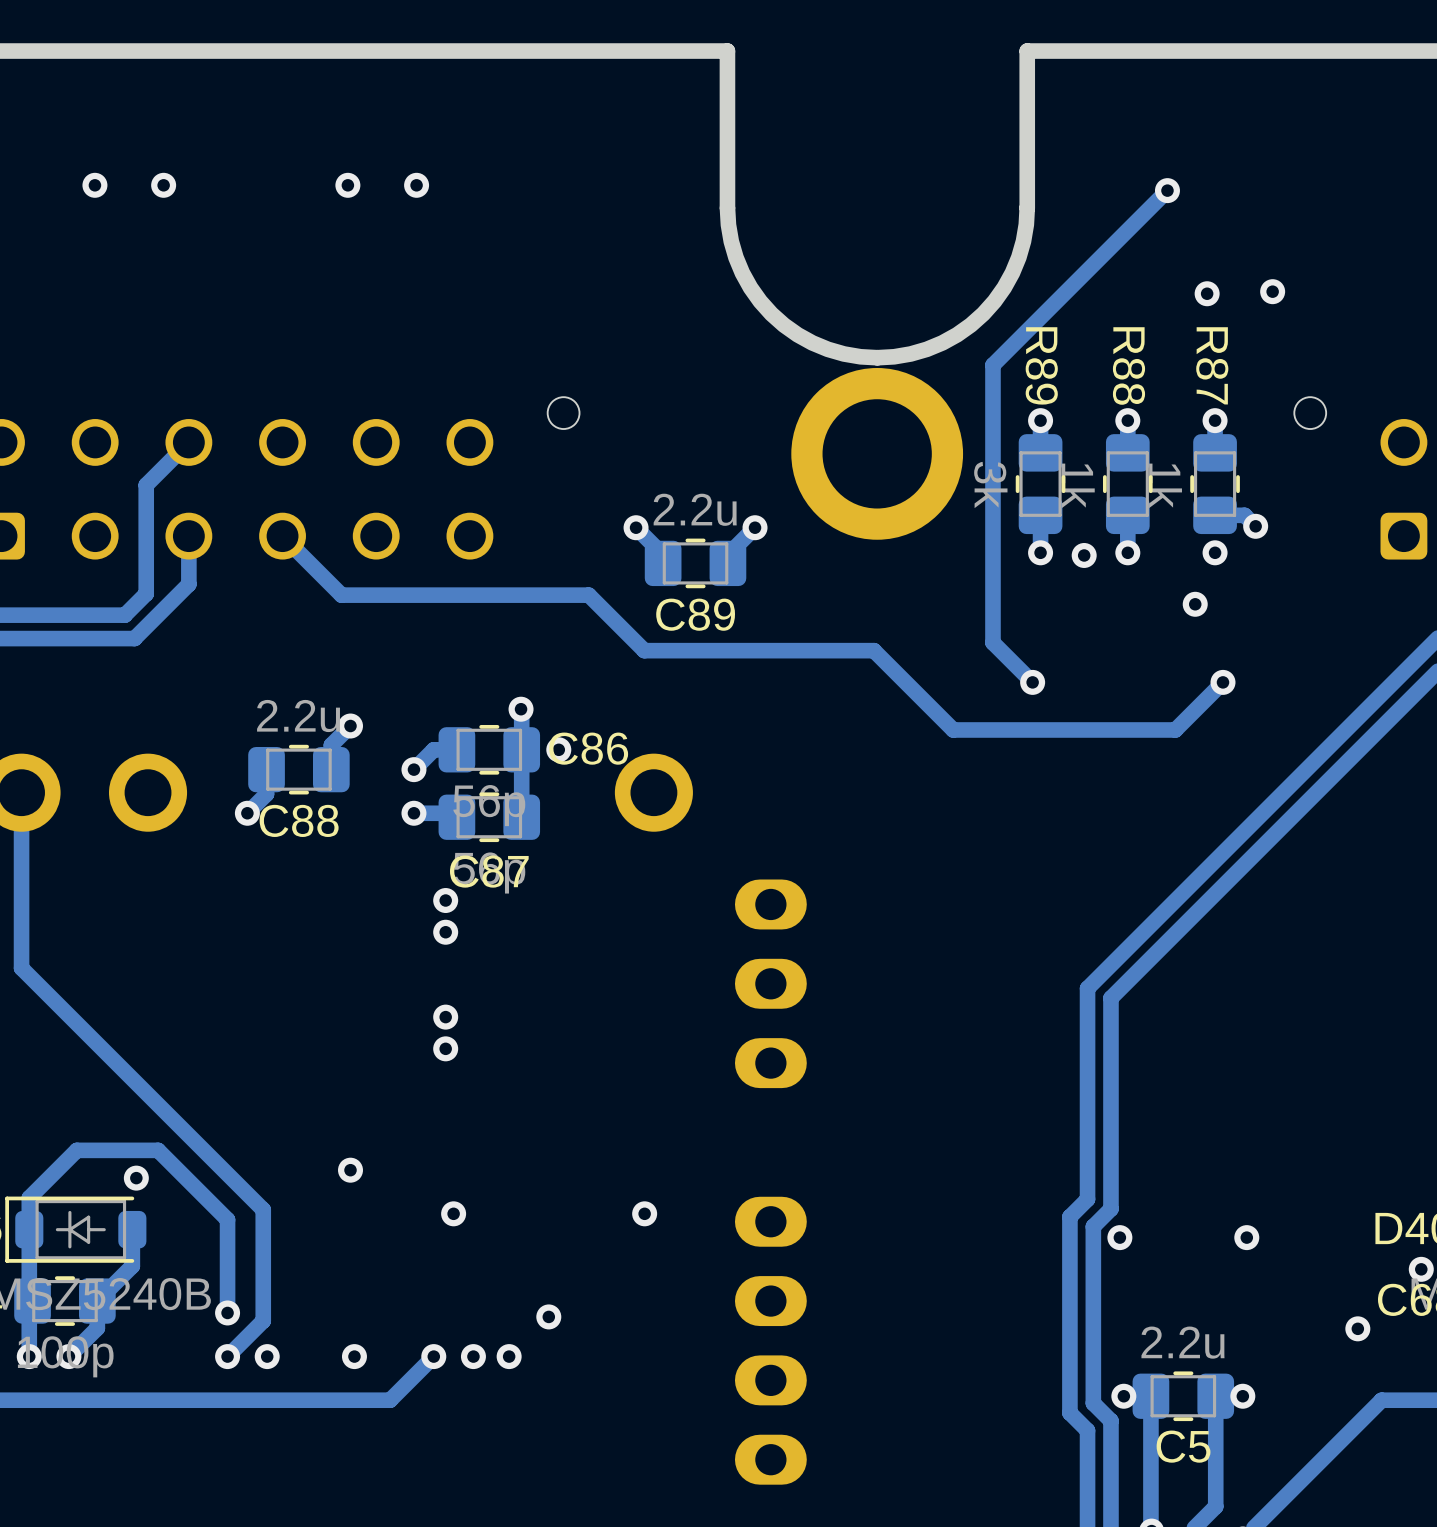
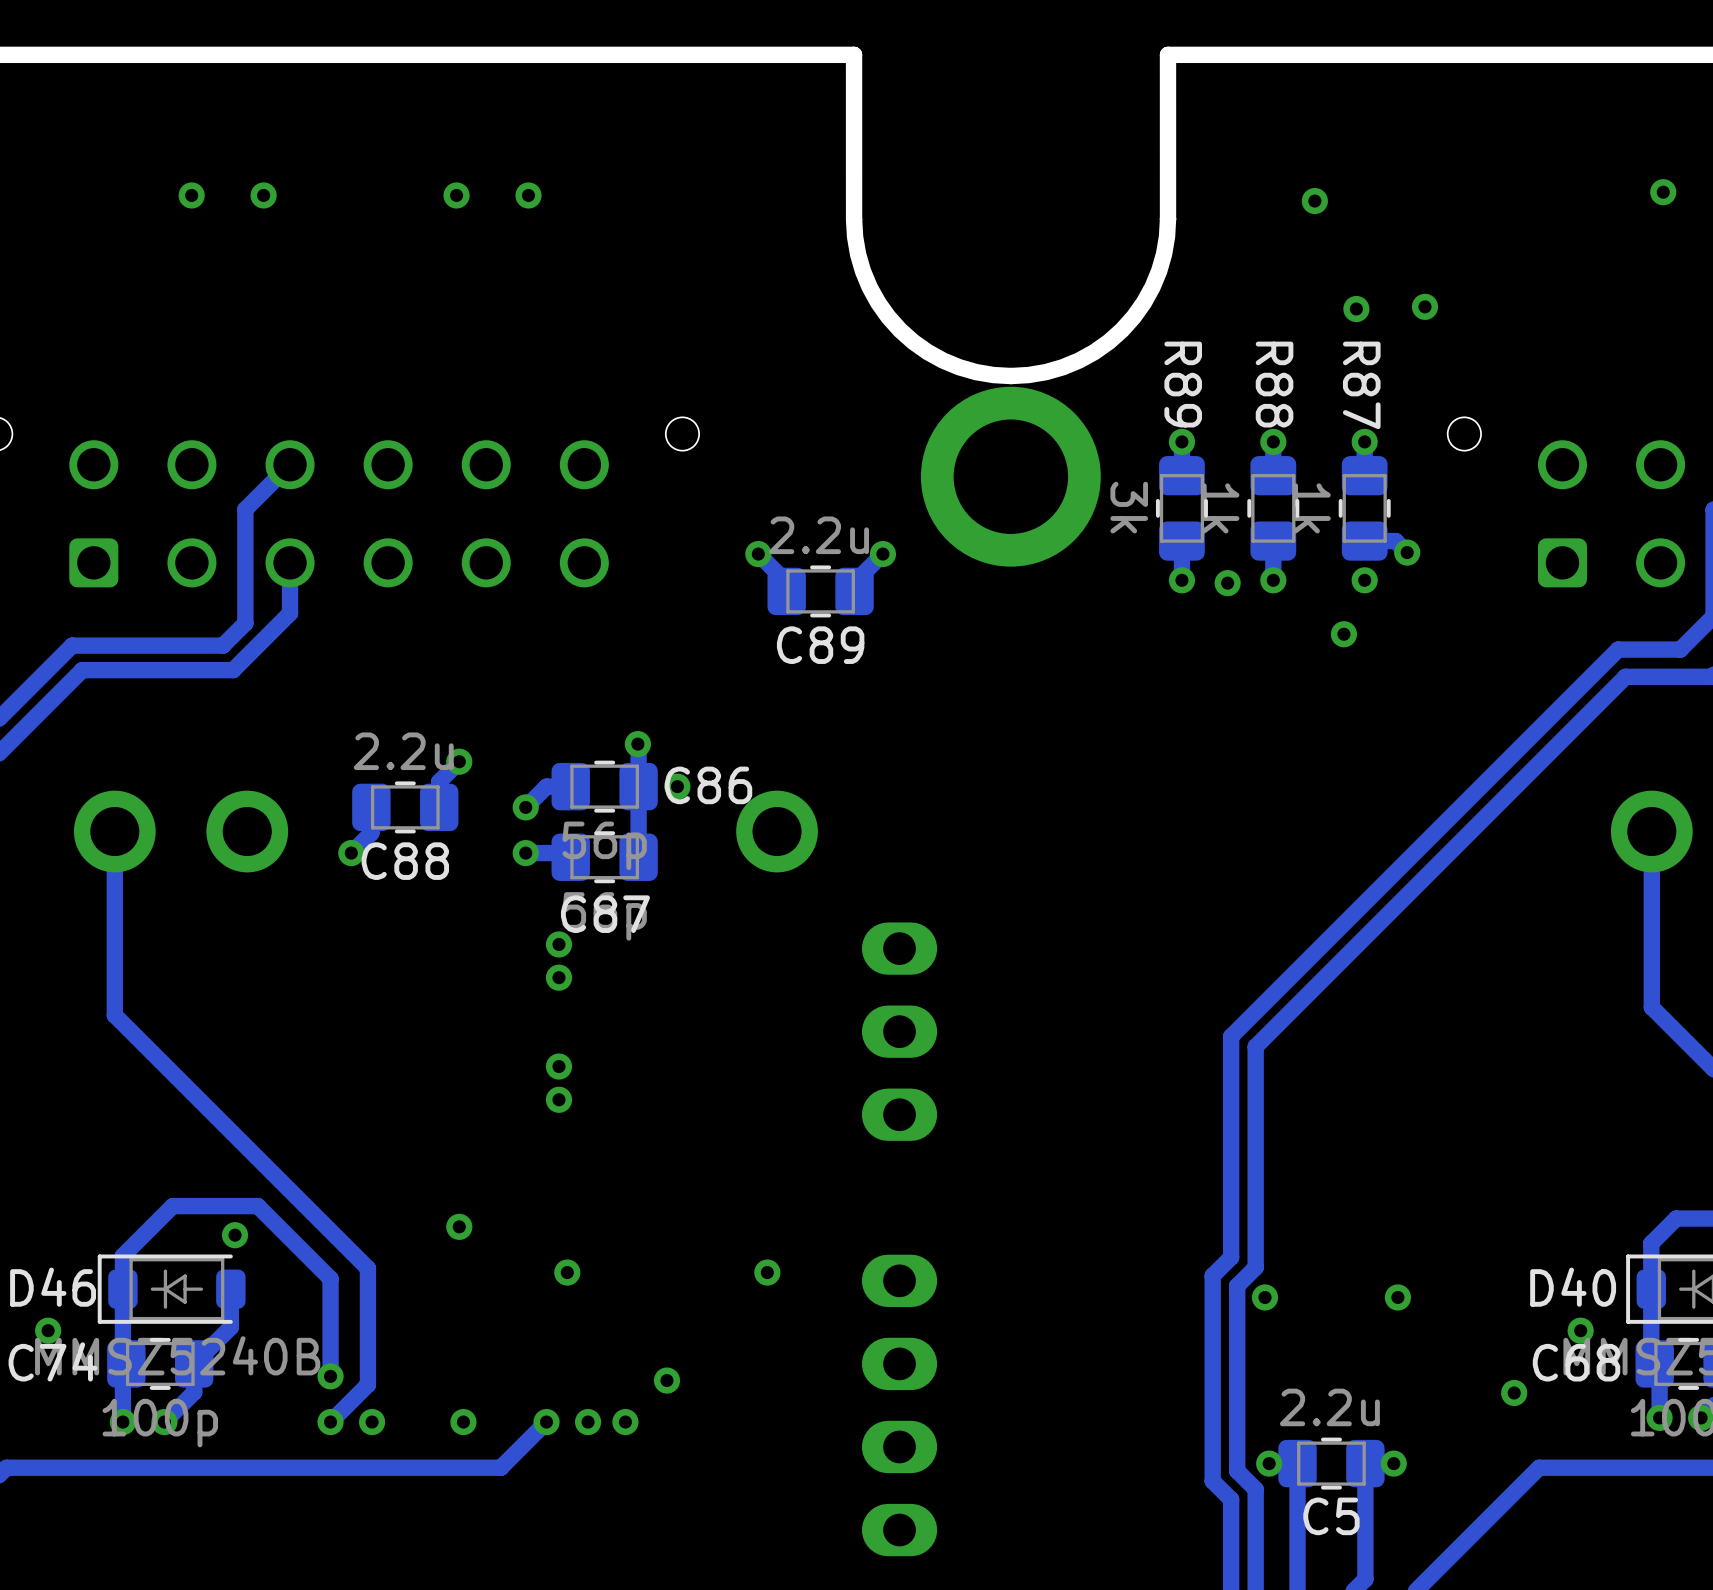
track: (1167, 190) (992, 365) (992, 642) (1032, 682) -> none
track: (282, 536) (341, 595) (588, 595) (644, 650) (874, 650) (953, 729) (1175, 729) (1222, 682) -> none
via: (1032, 682) -> none
via: (1222, 682) -> none

